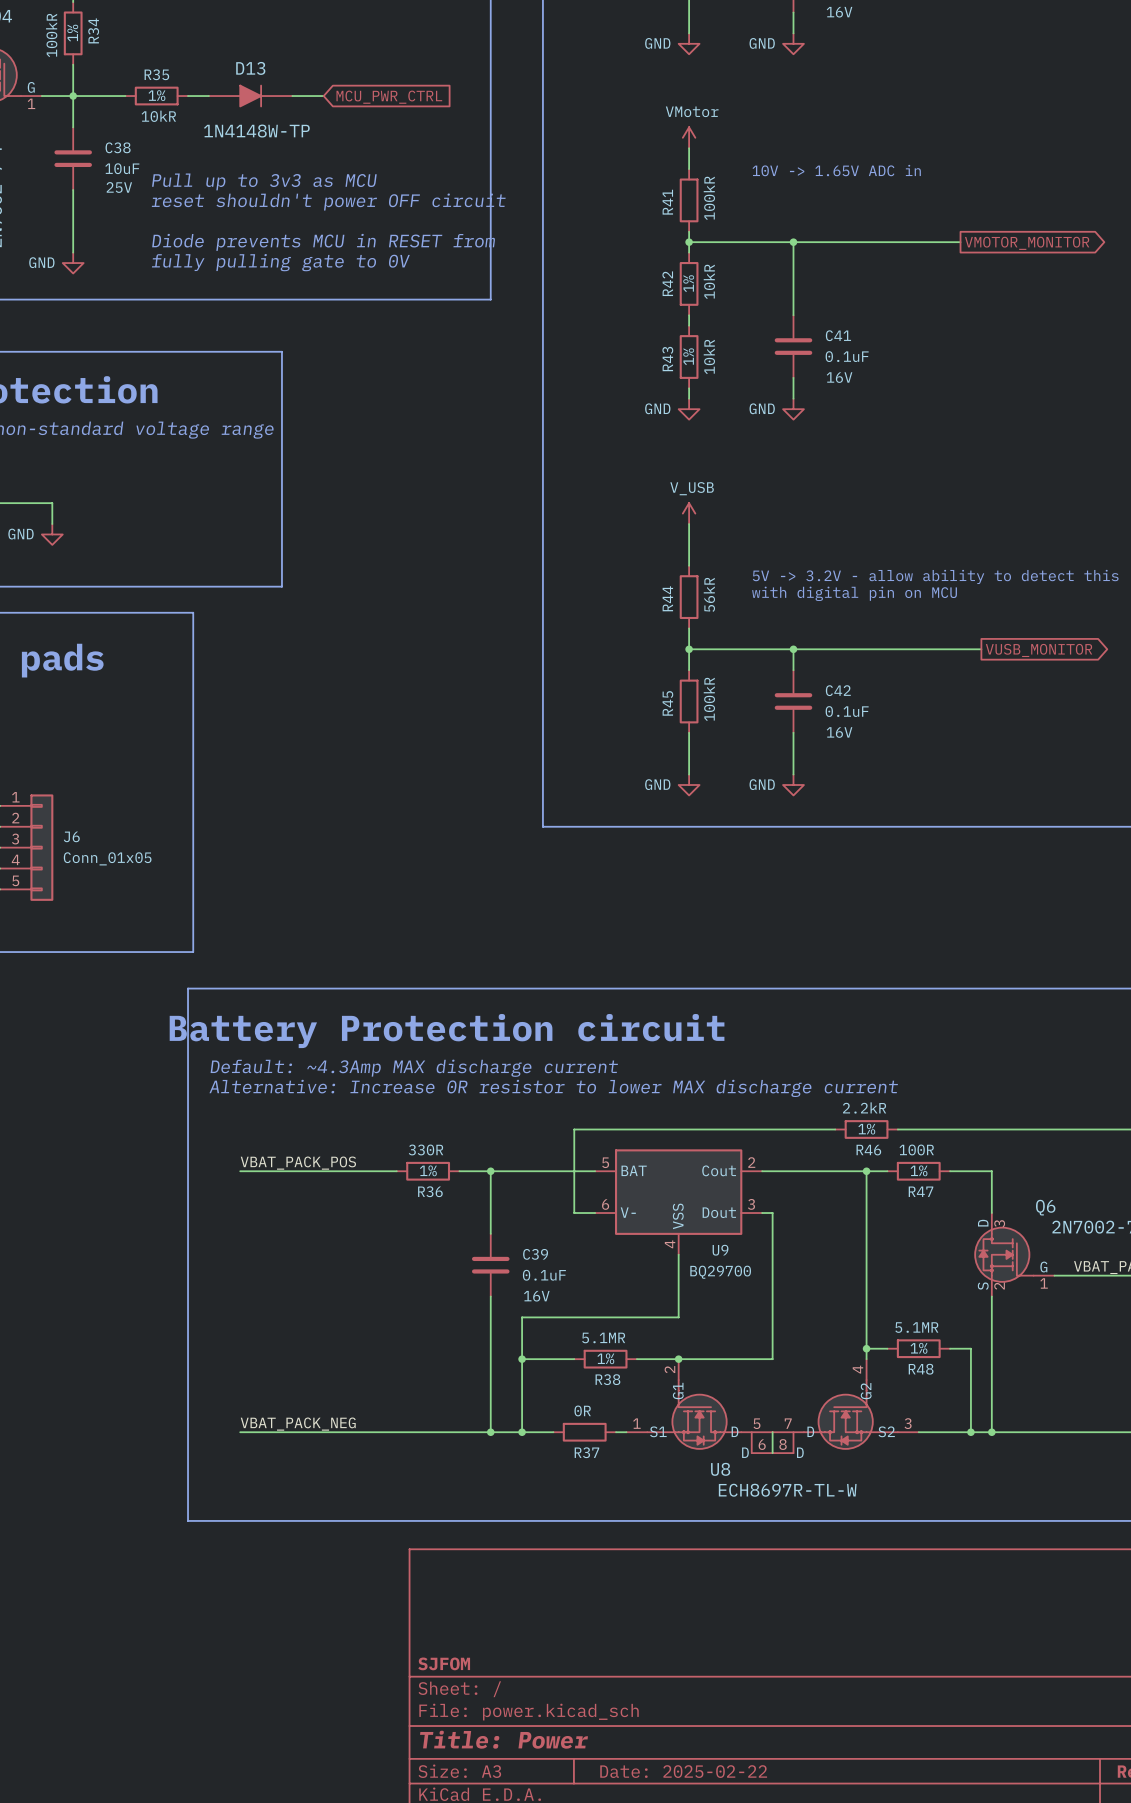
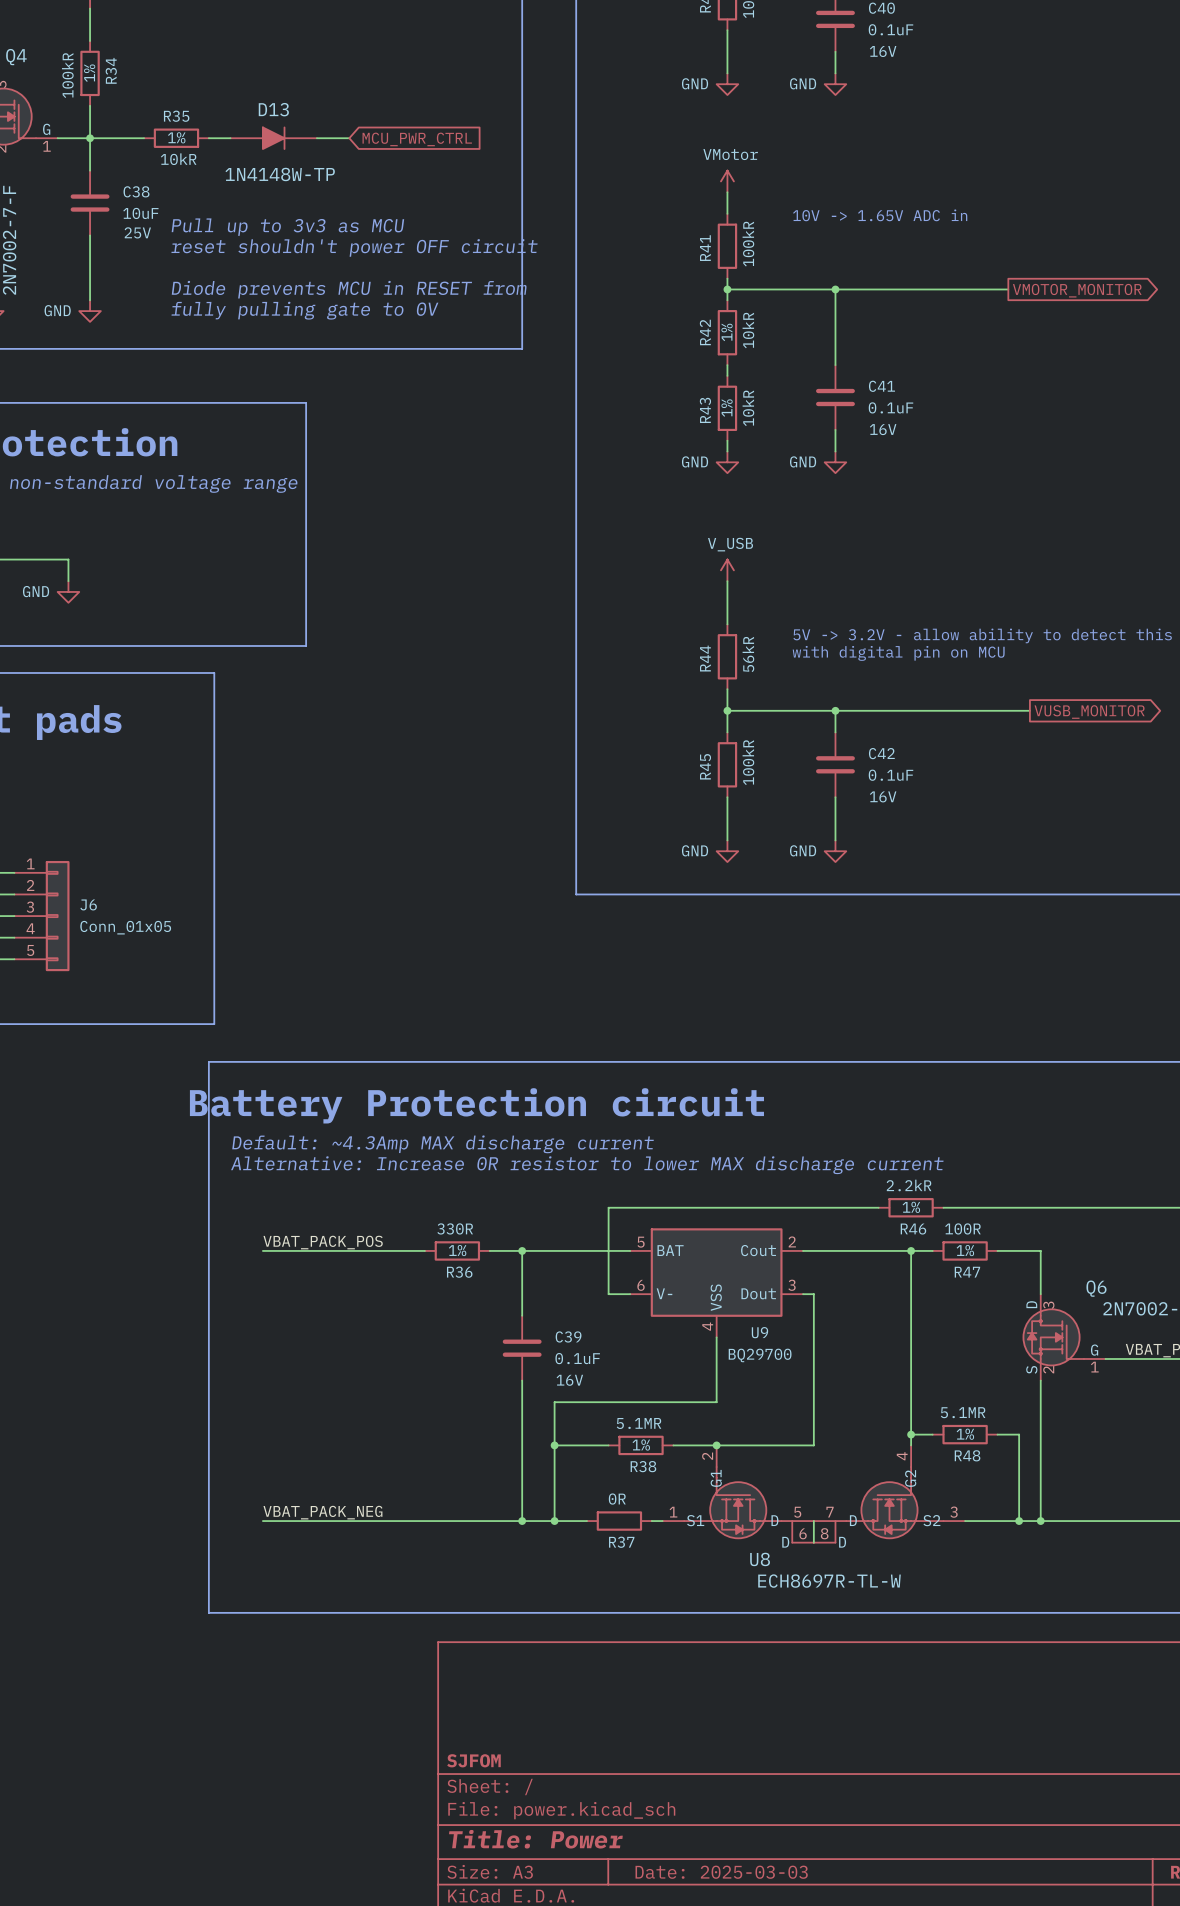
title block: Date: 2025-02-22 (683, 1771) -> Date: 2025-03-03 (721, 1872)

